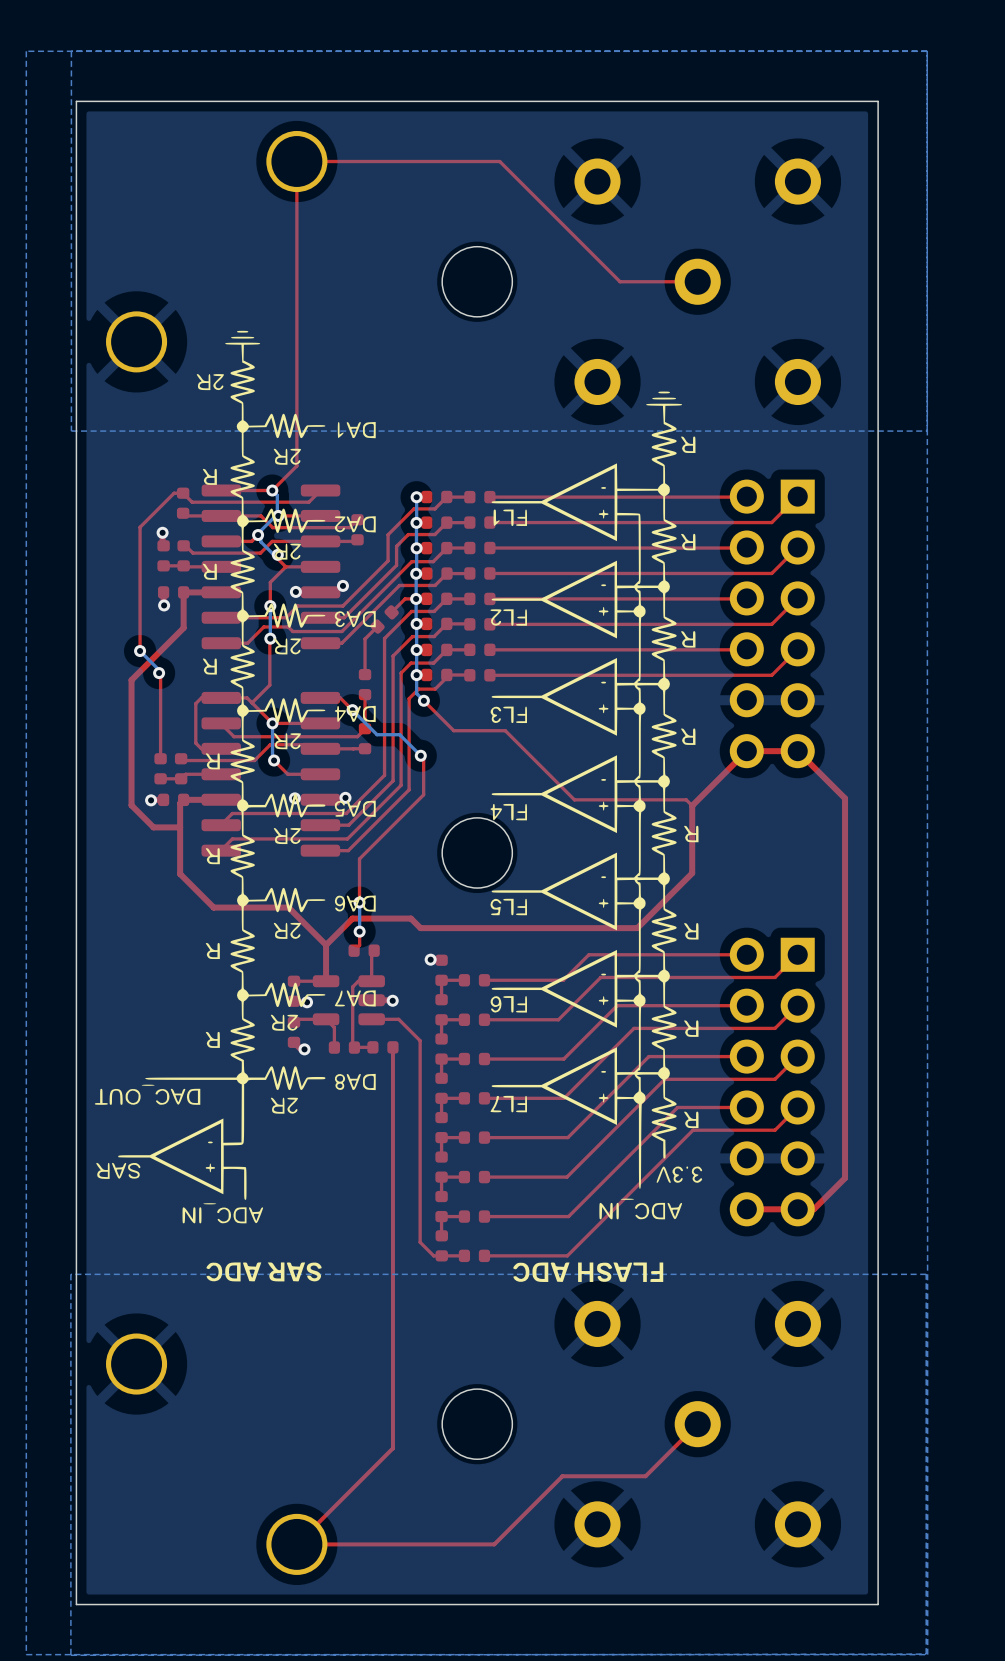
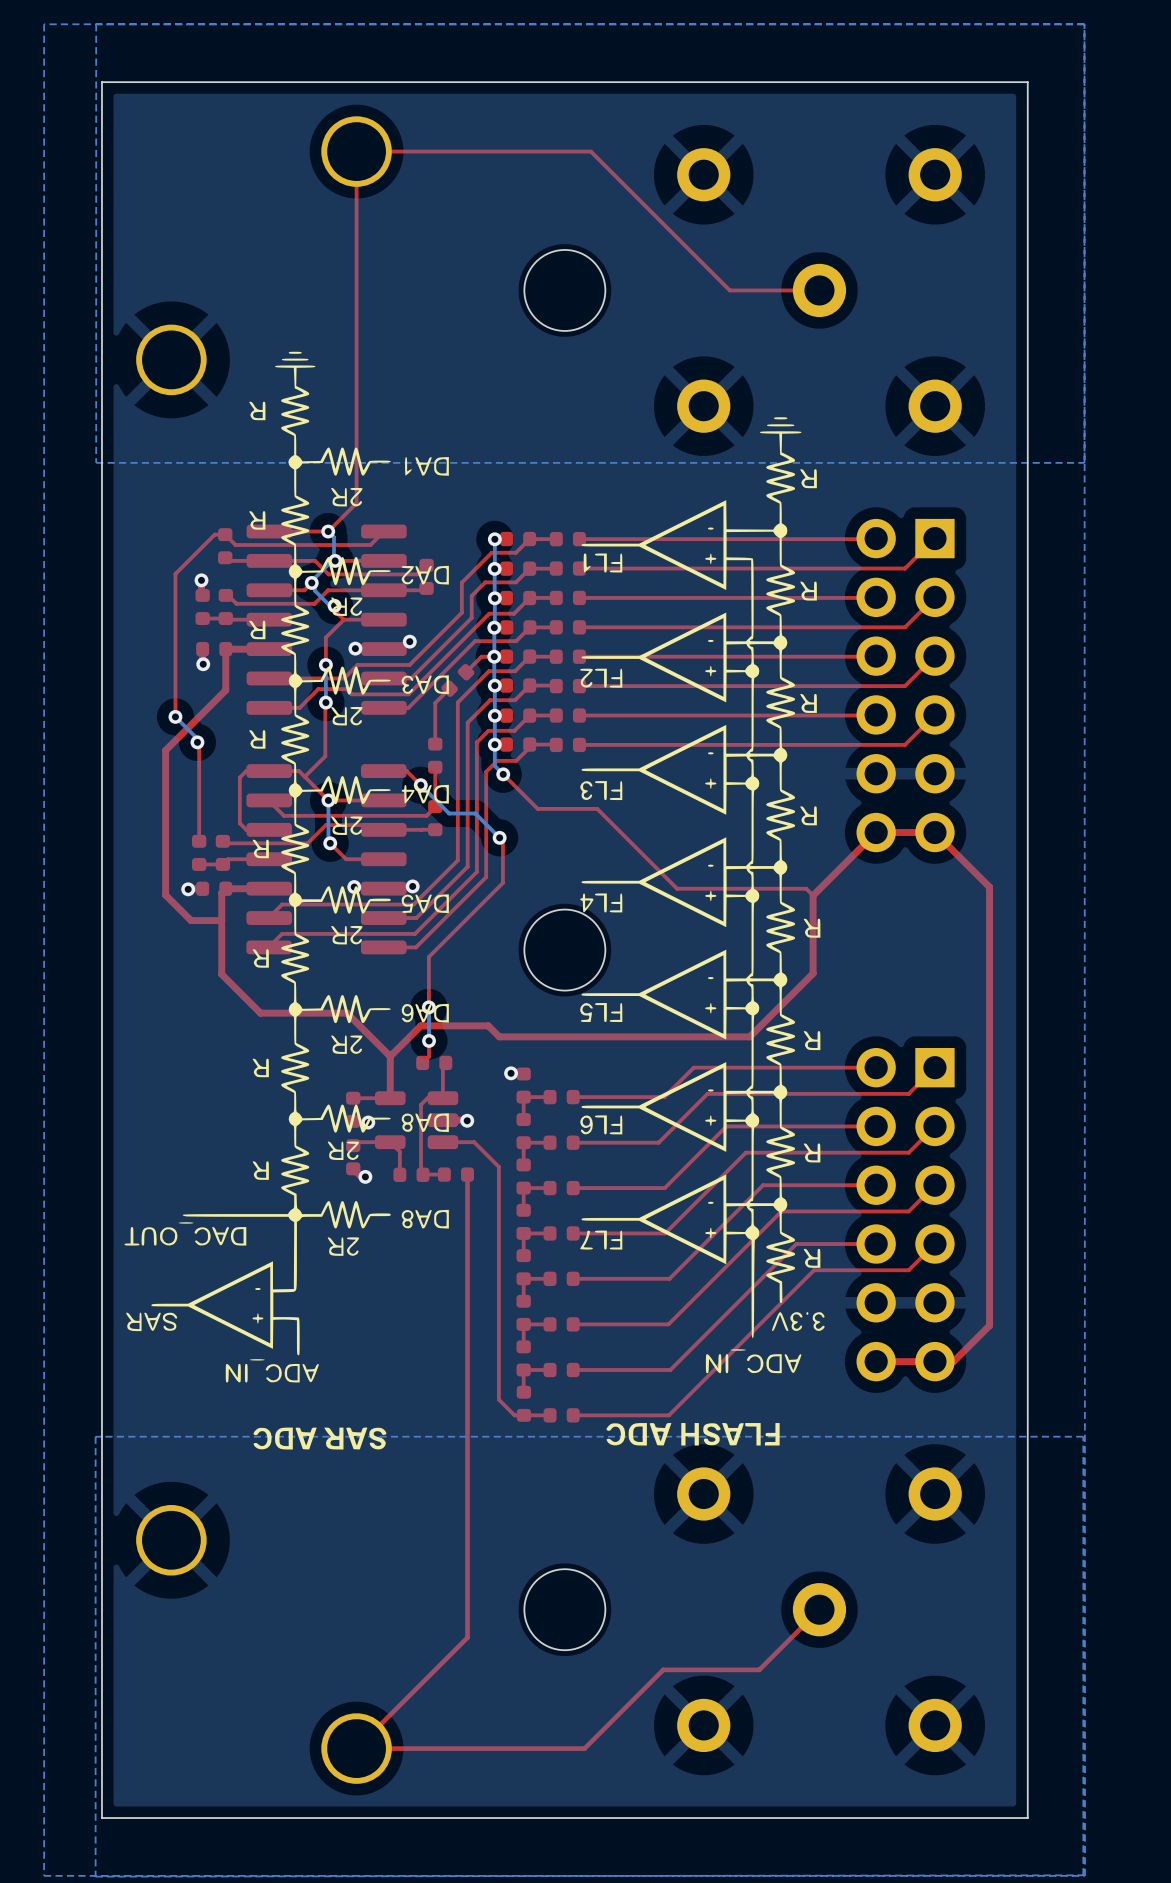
drawing shape: [94, 330, 376, 1282] -> [124, 351, 449, 1450]

